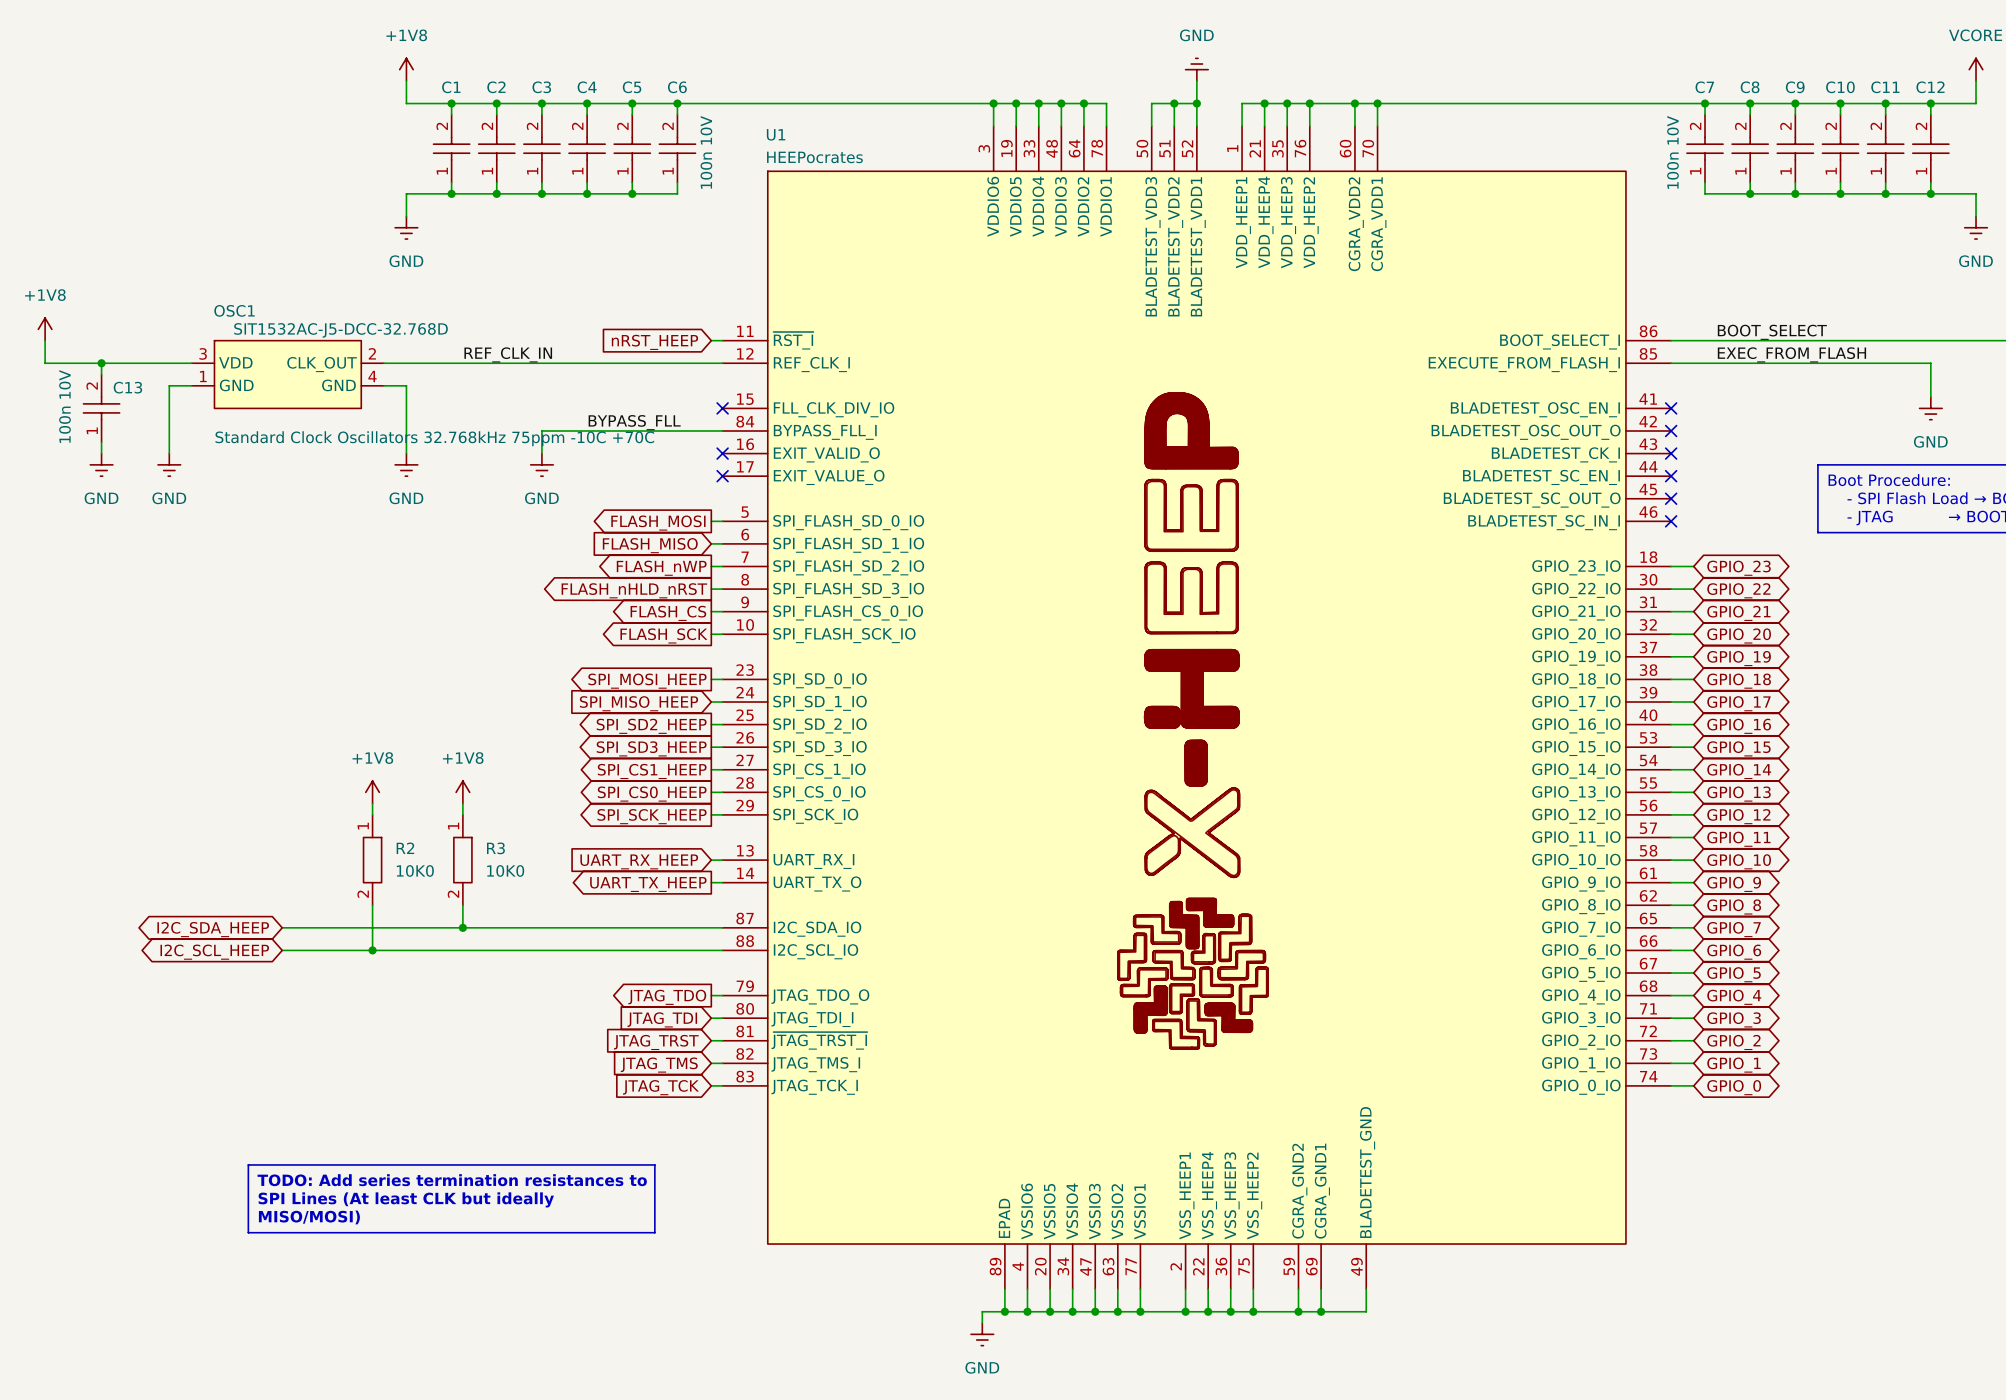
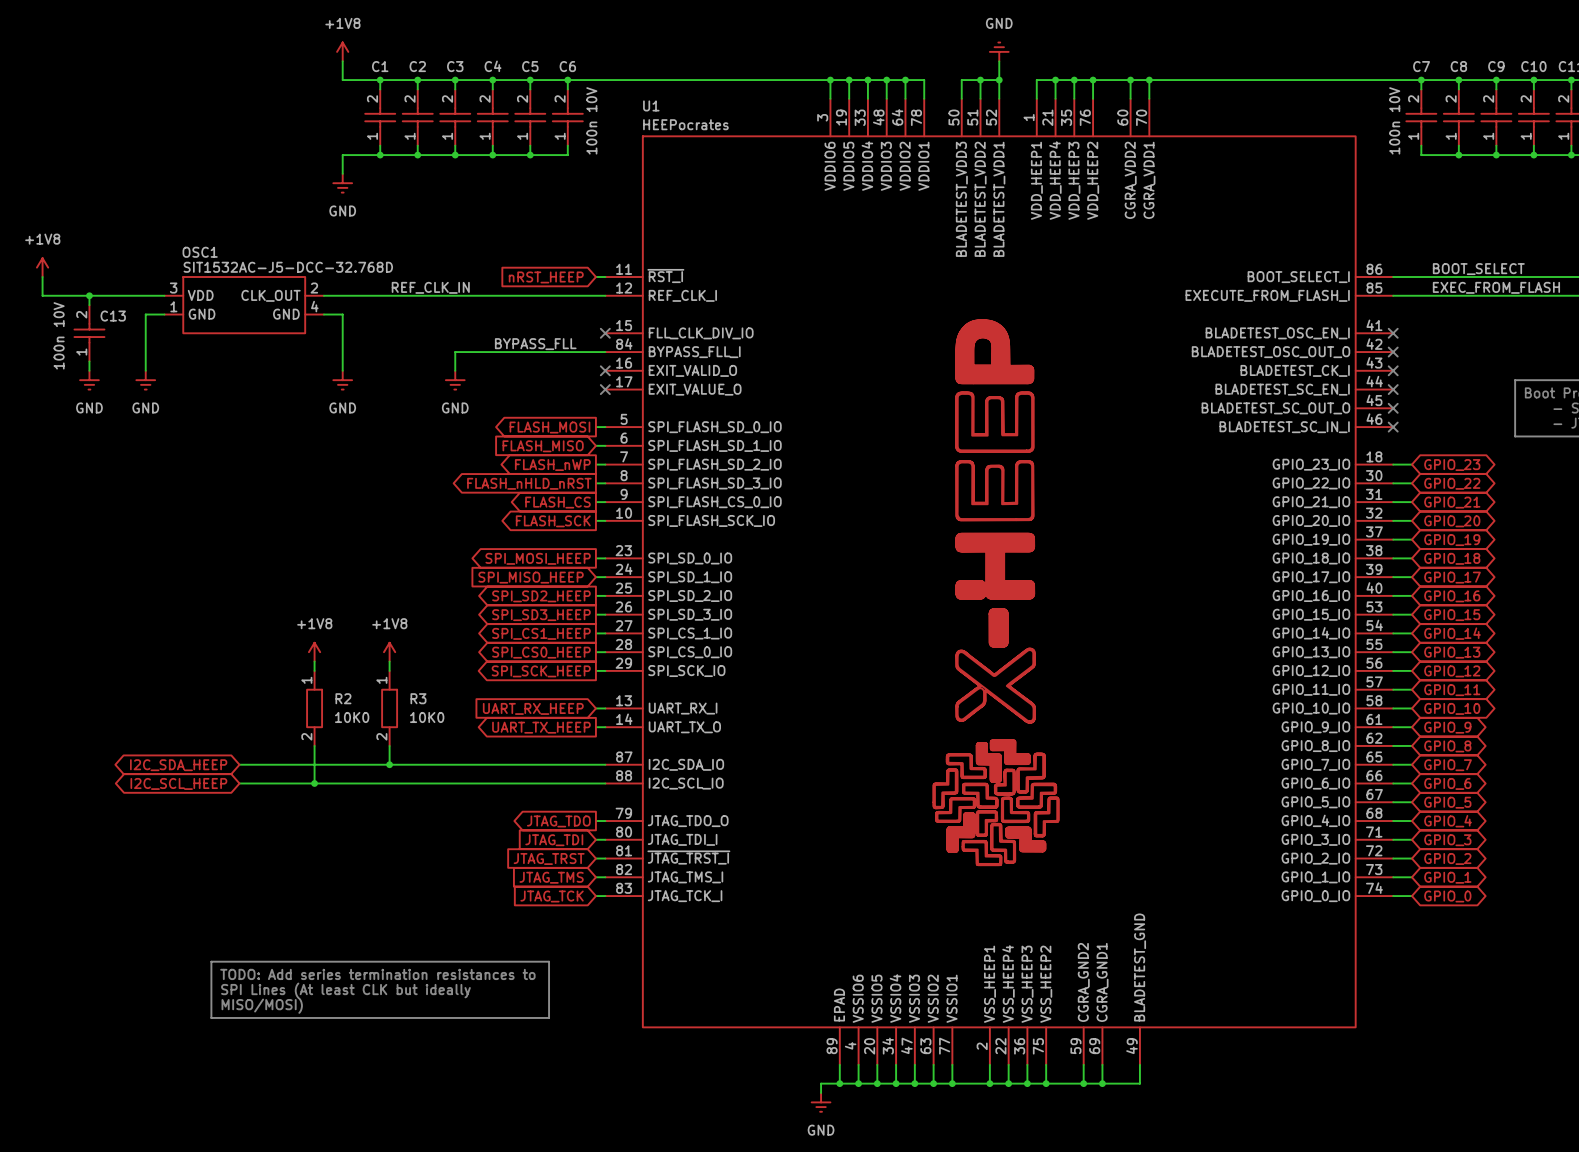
OSC1 text: Standard Clock Oscillators 32.768kHz 75ppm -10C +70C (434, 438) -> none

